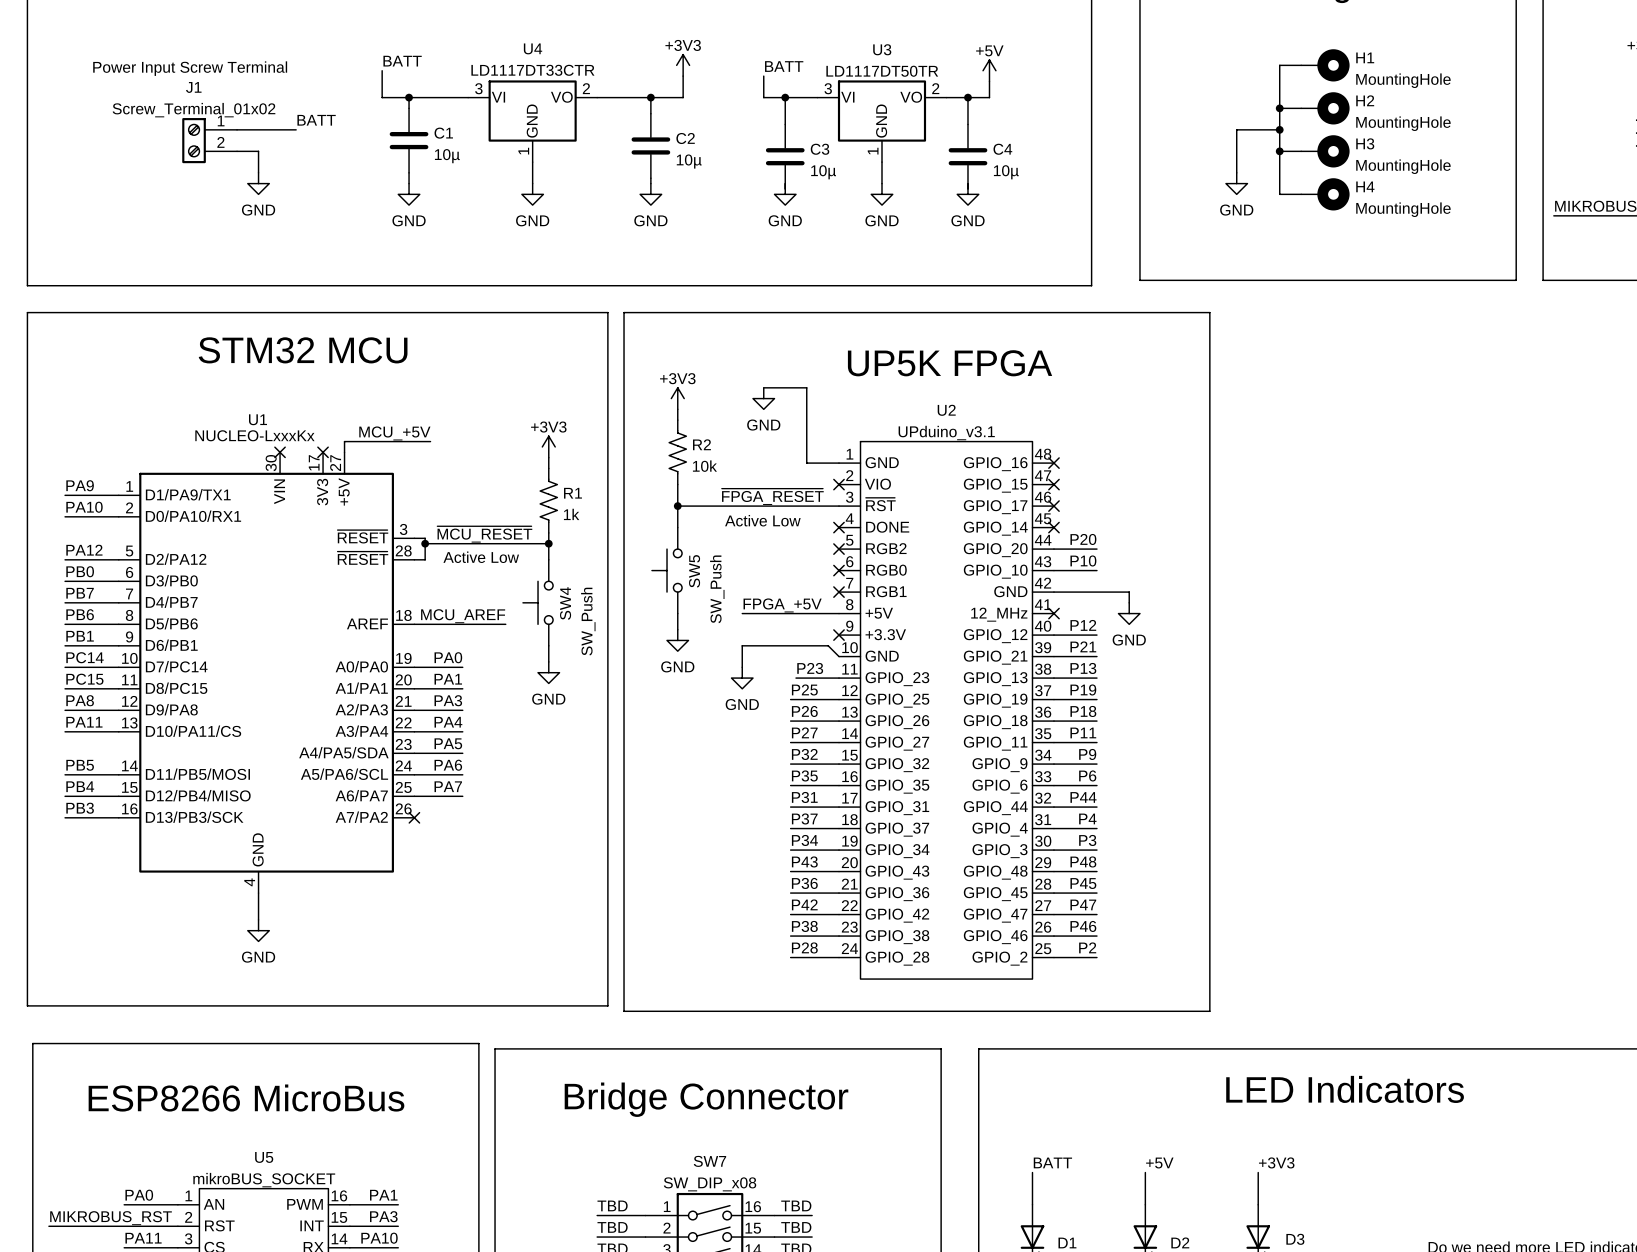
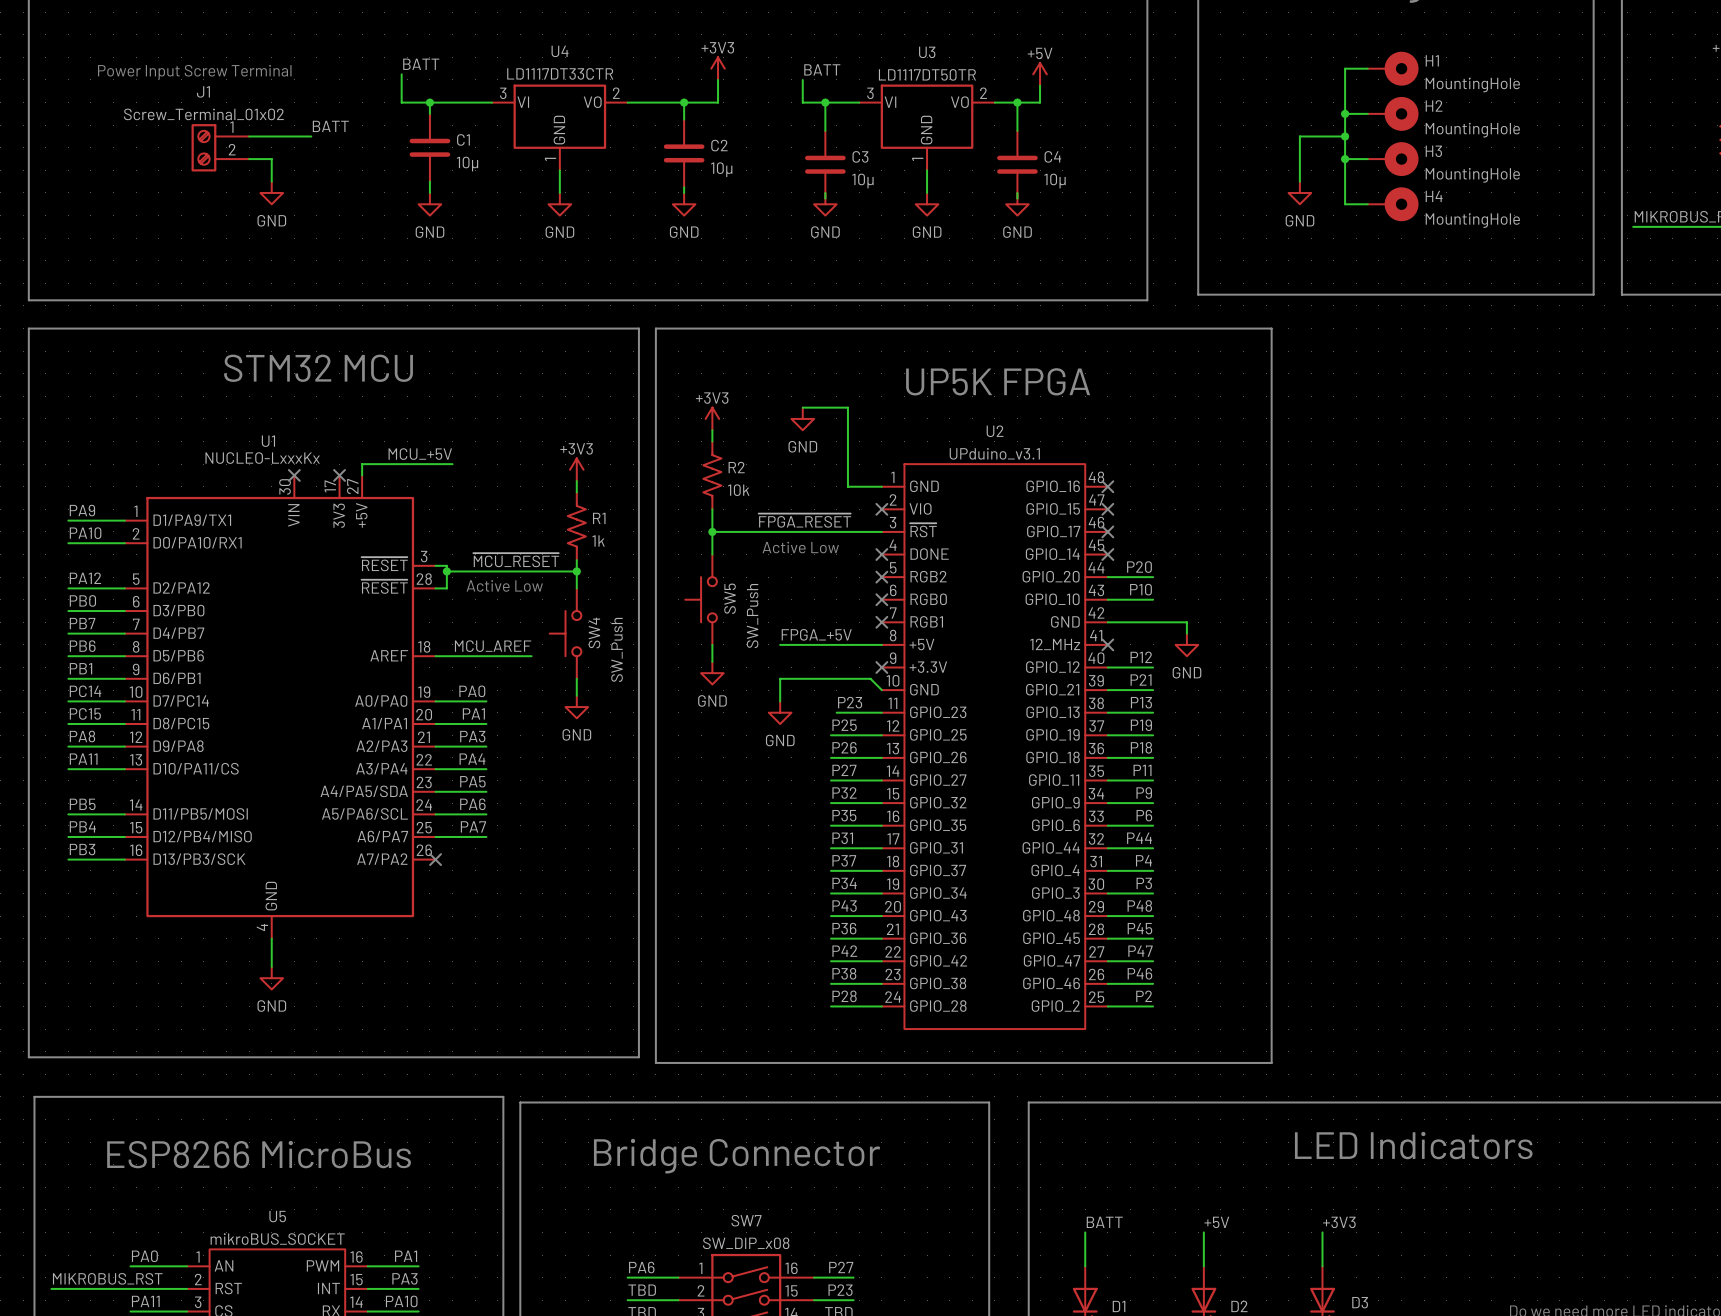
label: TBD (612, 1205) -> PA6 (641, 1267)
label: TBD (796, 1205) -> P27 (841, 1267)
label: TBD (796, 1227) -> P23 (840, 1290)

